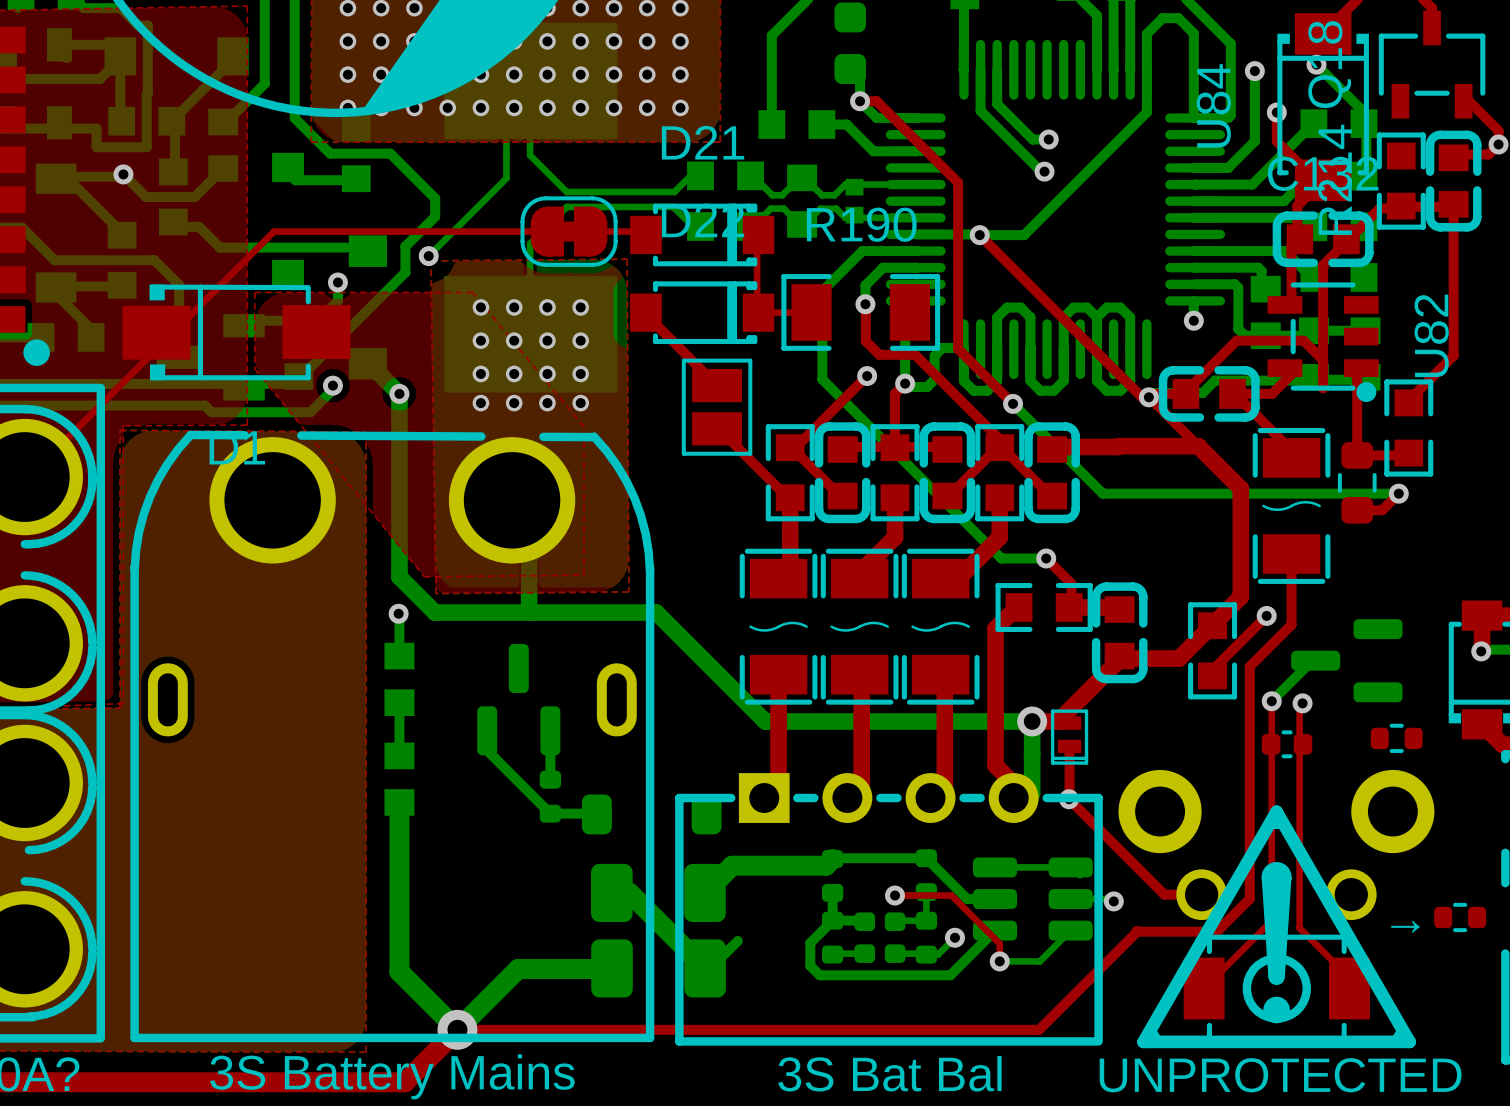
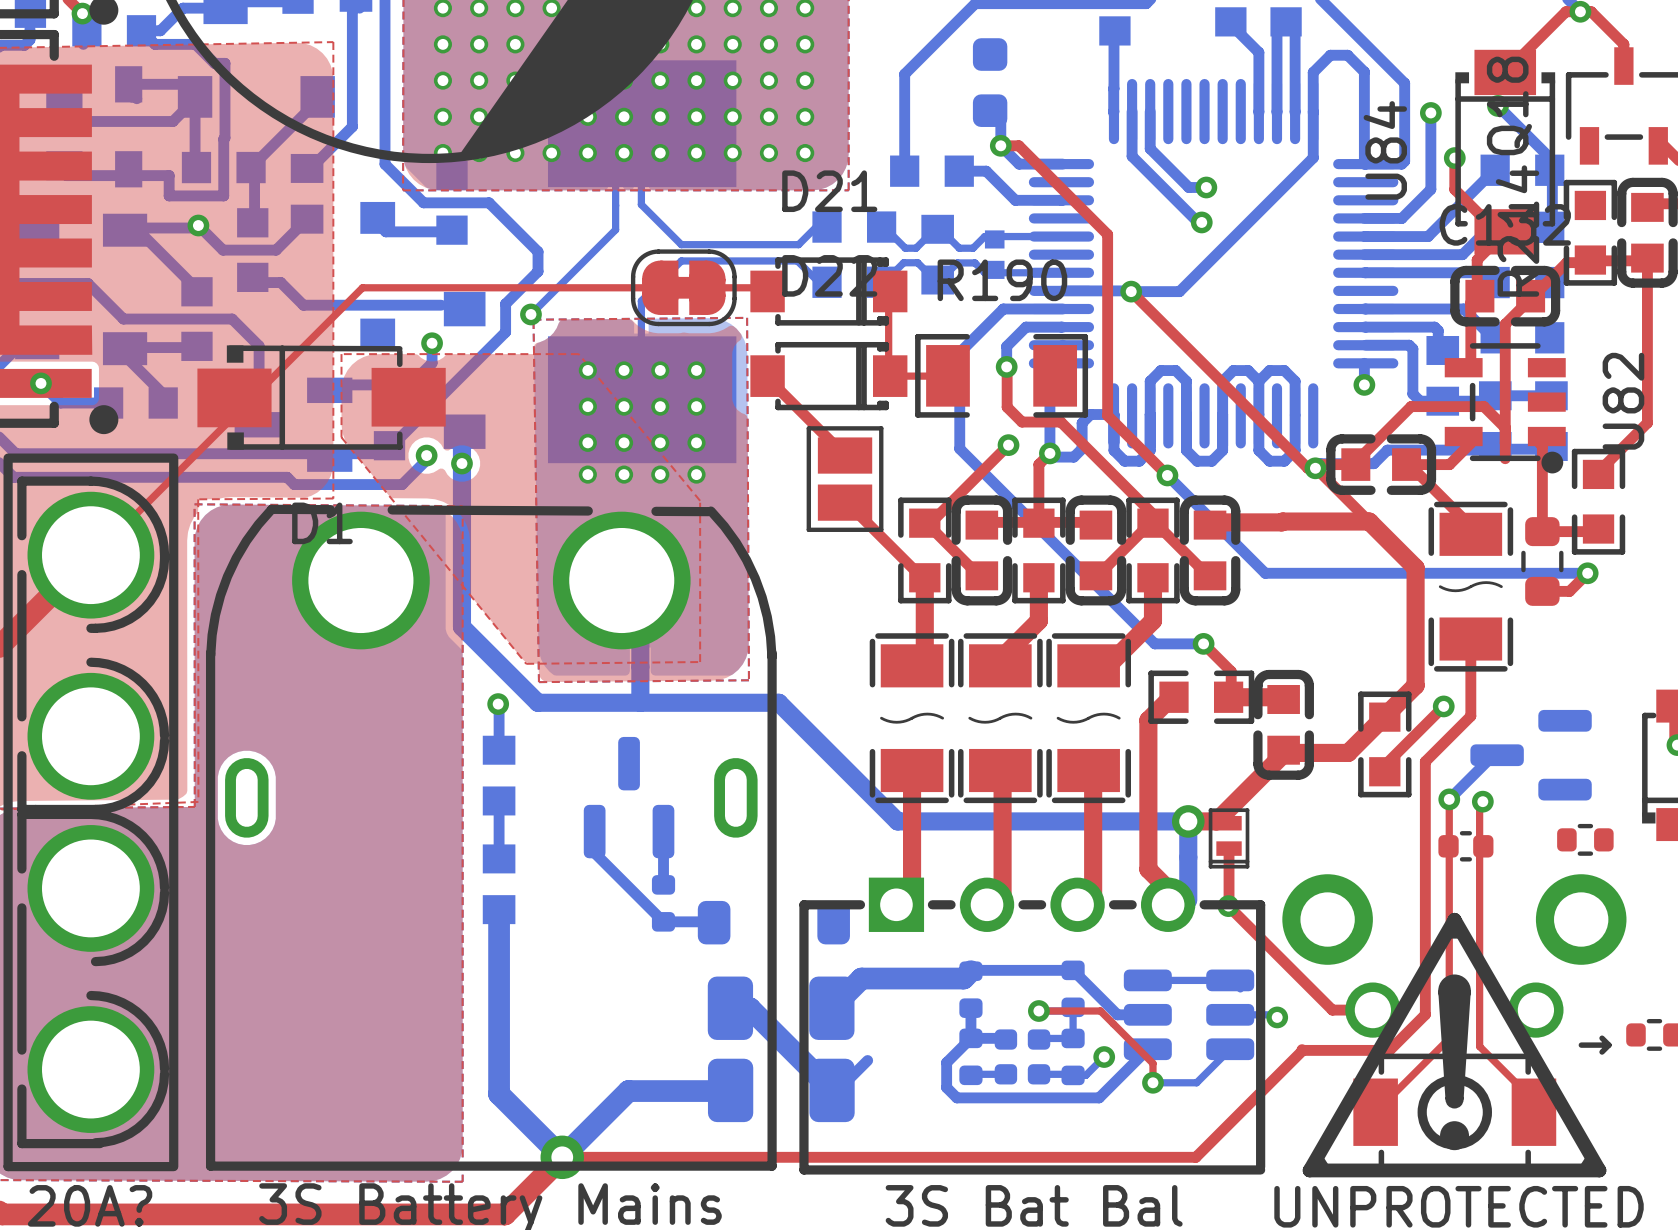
bottom track: (367, 362) (399, 393) (399, 576) -> (464, 430) (461, 432) (461, 626) (499, 664)
via position: (399, 393) -> (461, 463)

